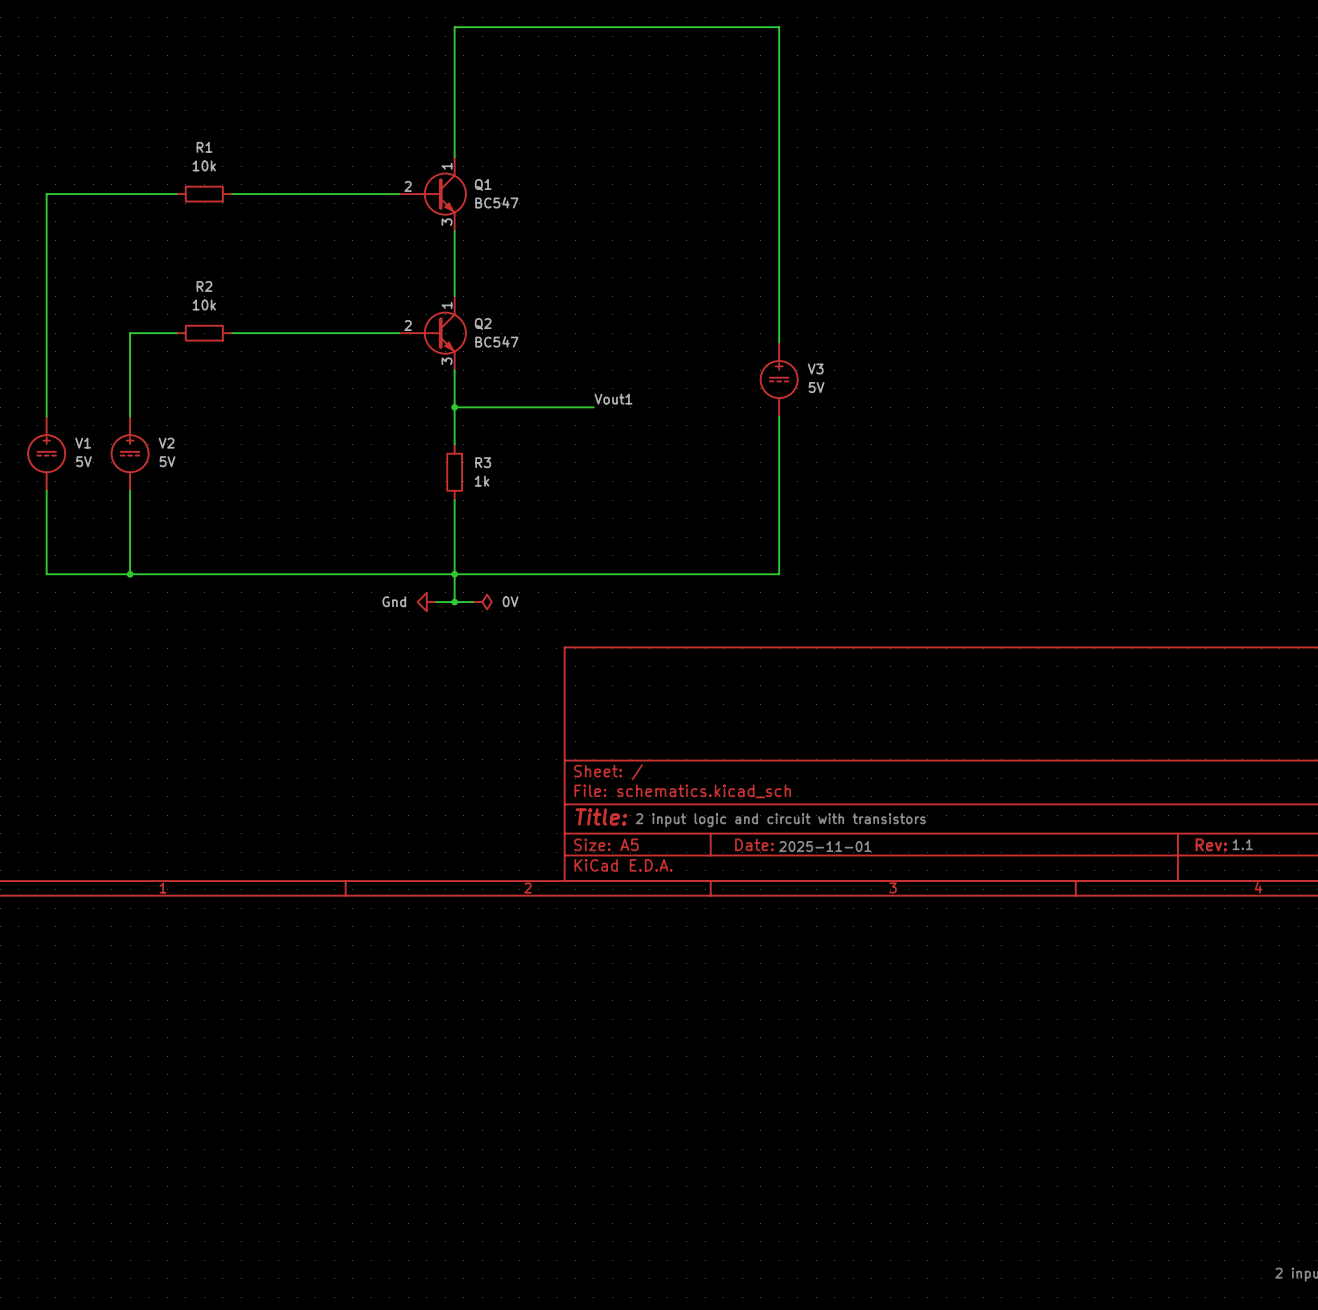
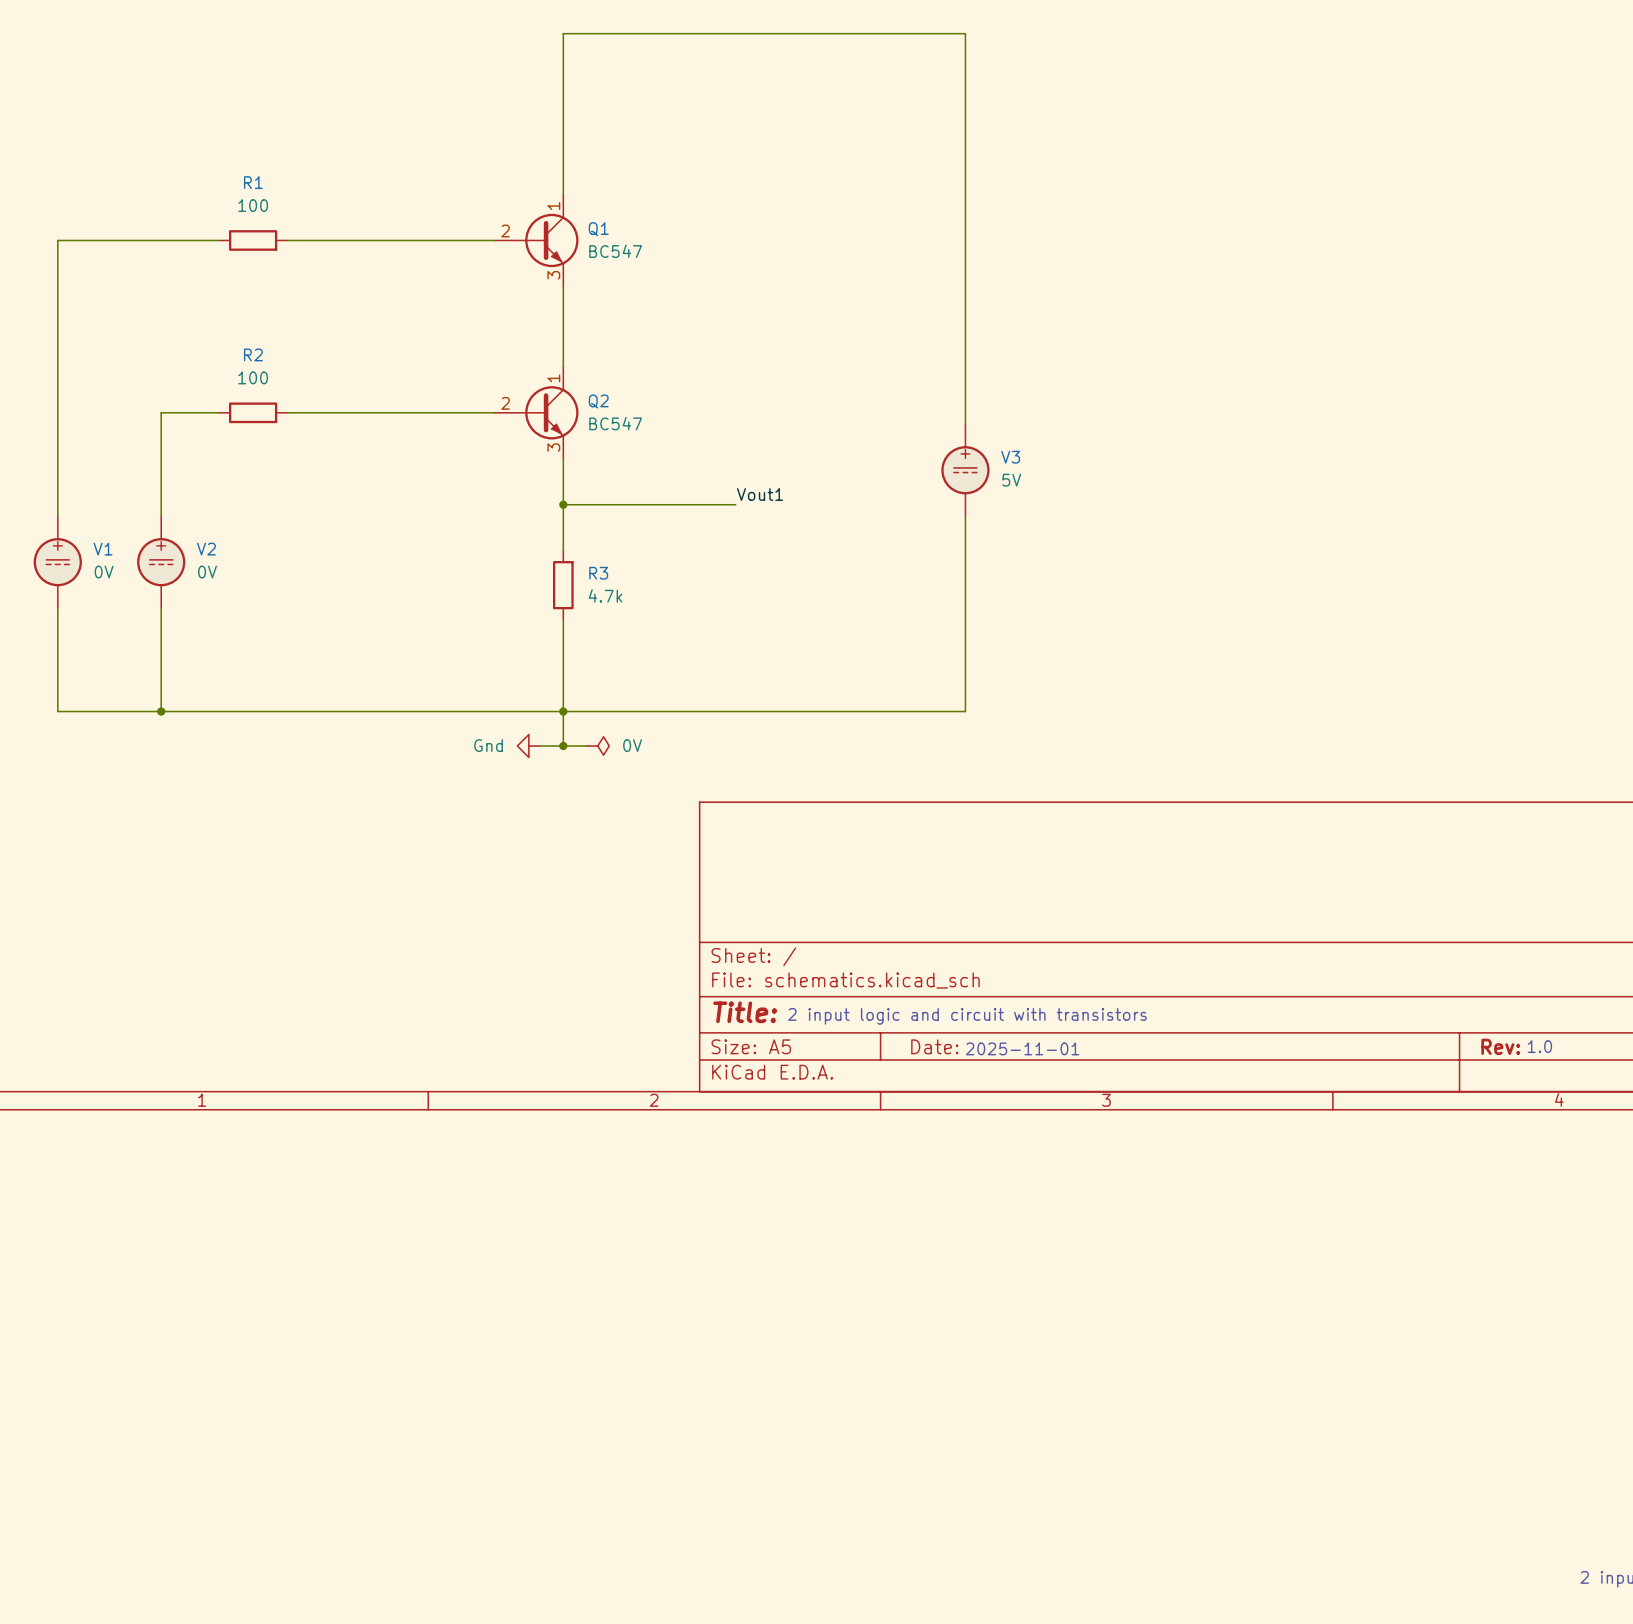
R1 value: 10k (204, 165) -> 100 (253, 205)
R2 value: 10k (204, 305) -> 100 (253, 377)
V1 value: 5V (84, 461) -> 0V (104, 572)
V2 value: 5V (167, 461) -> 0V (207, 572)
R3 value: 1k (482, 481) -> 4.7k (605, 595)
text: 1.1 (1242, 844) -> 1.0 (1539, 1046)

